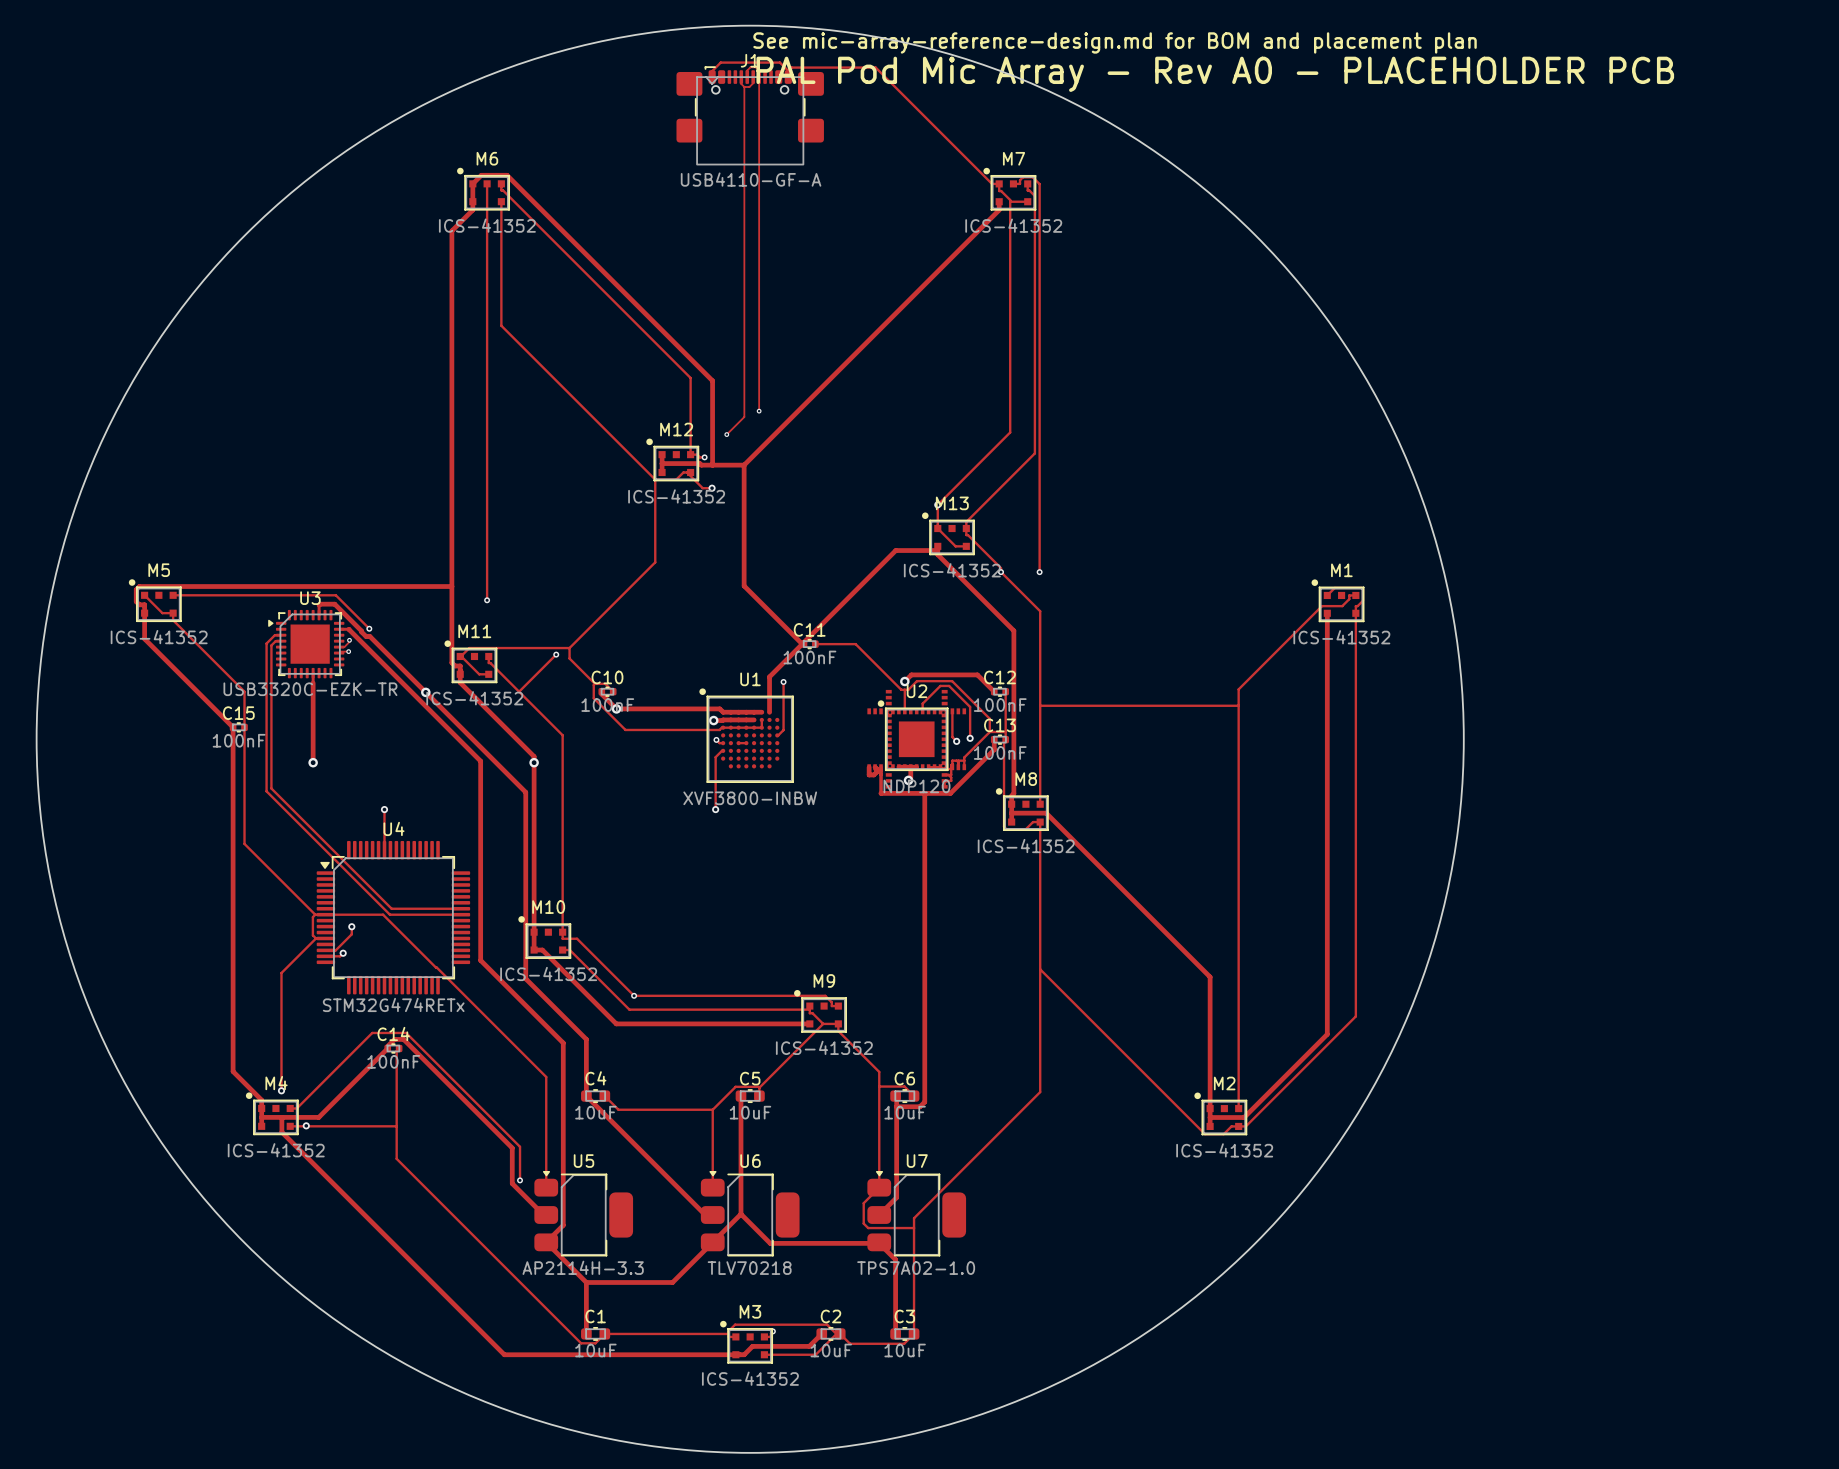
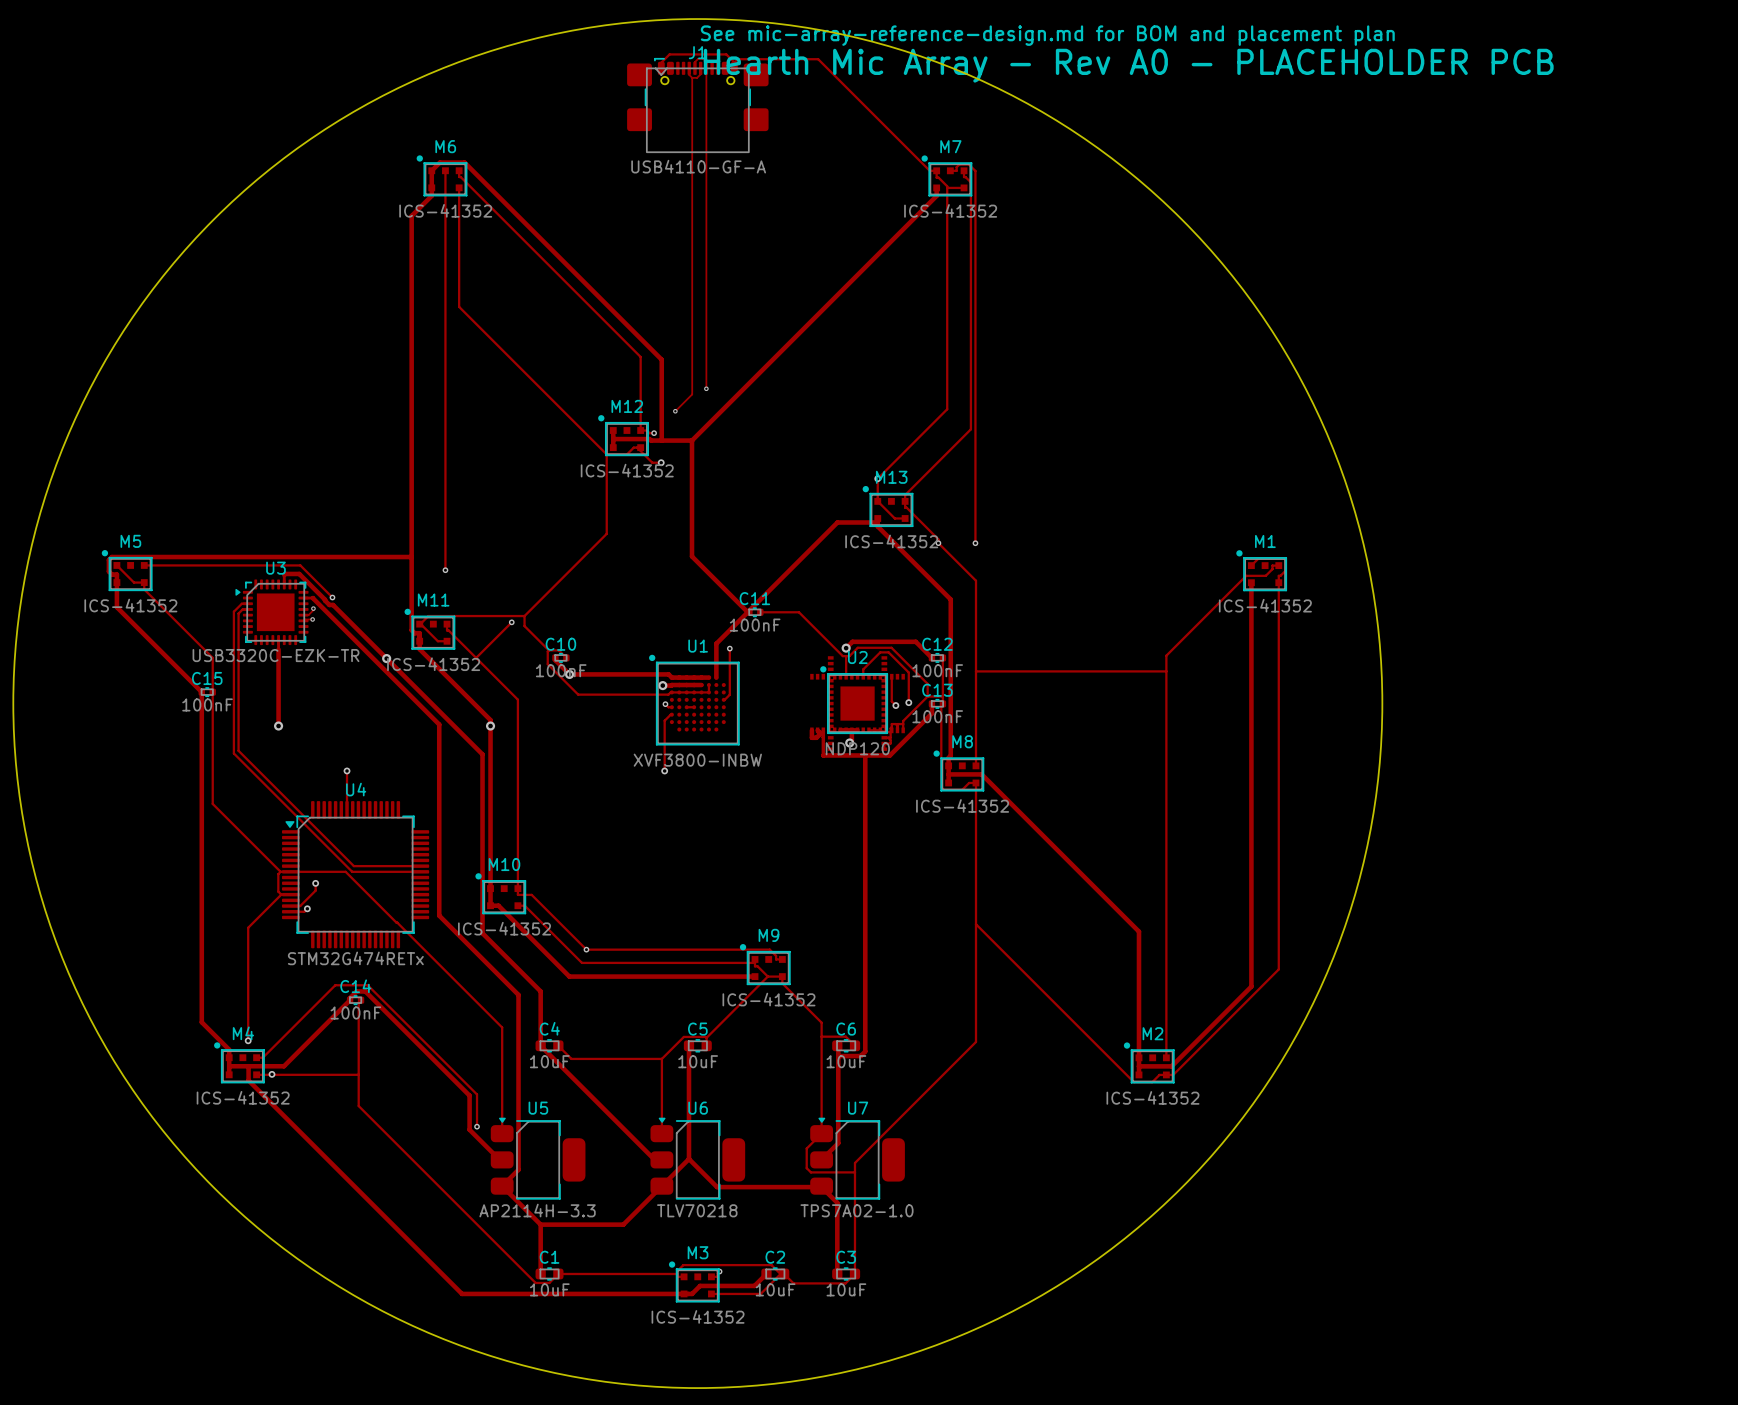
text: PAL Pod Mic Array - Rev A0 - PLACEHOLDER PCB (1215, 74) -> Hearth Mic Array - Rev A0 - PLACEHOLDER PCB (1128, 65)

